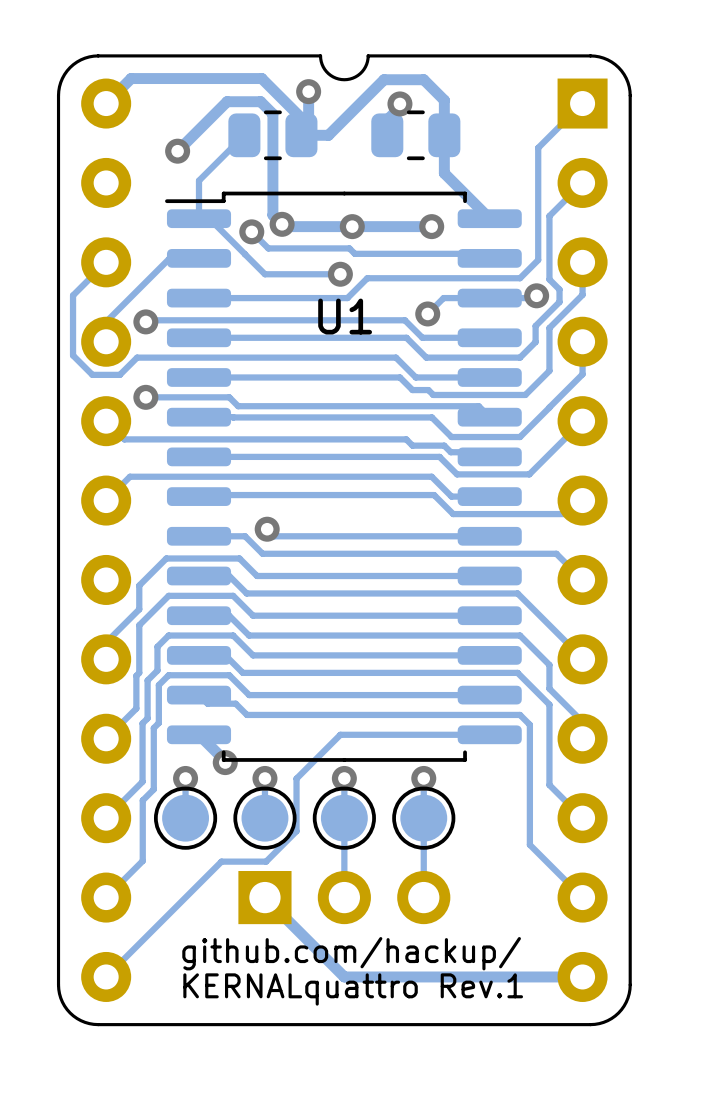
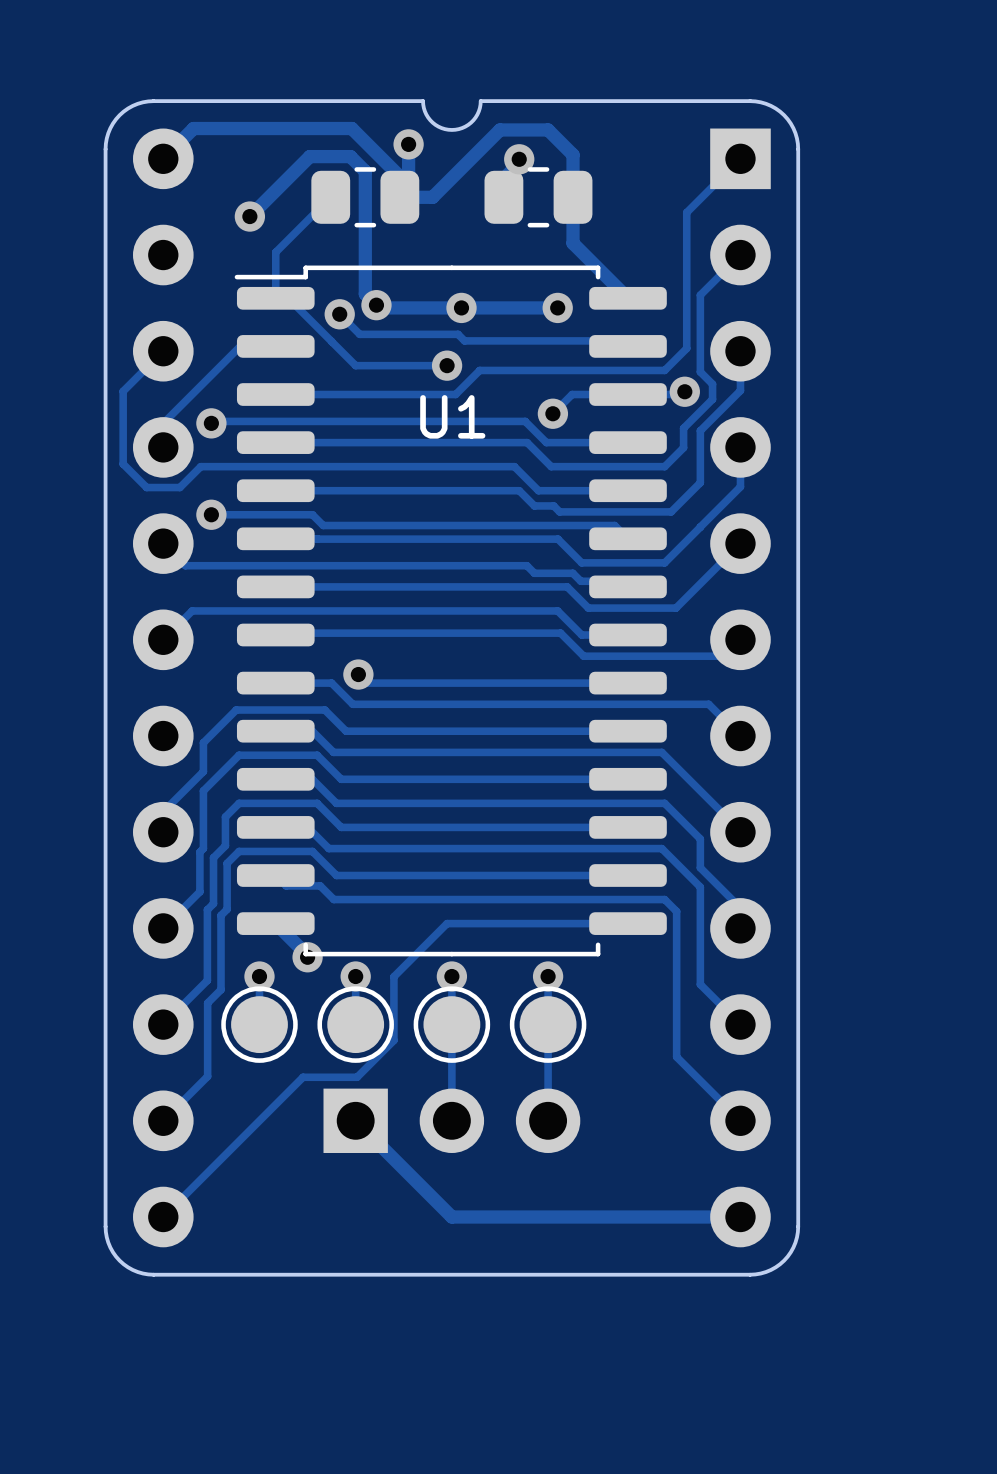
text: github.com/hackup/ (351, 953) -> none
text: KERNALquattro Rev.1 (353, 989) -> none

